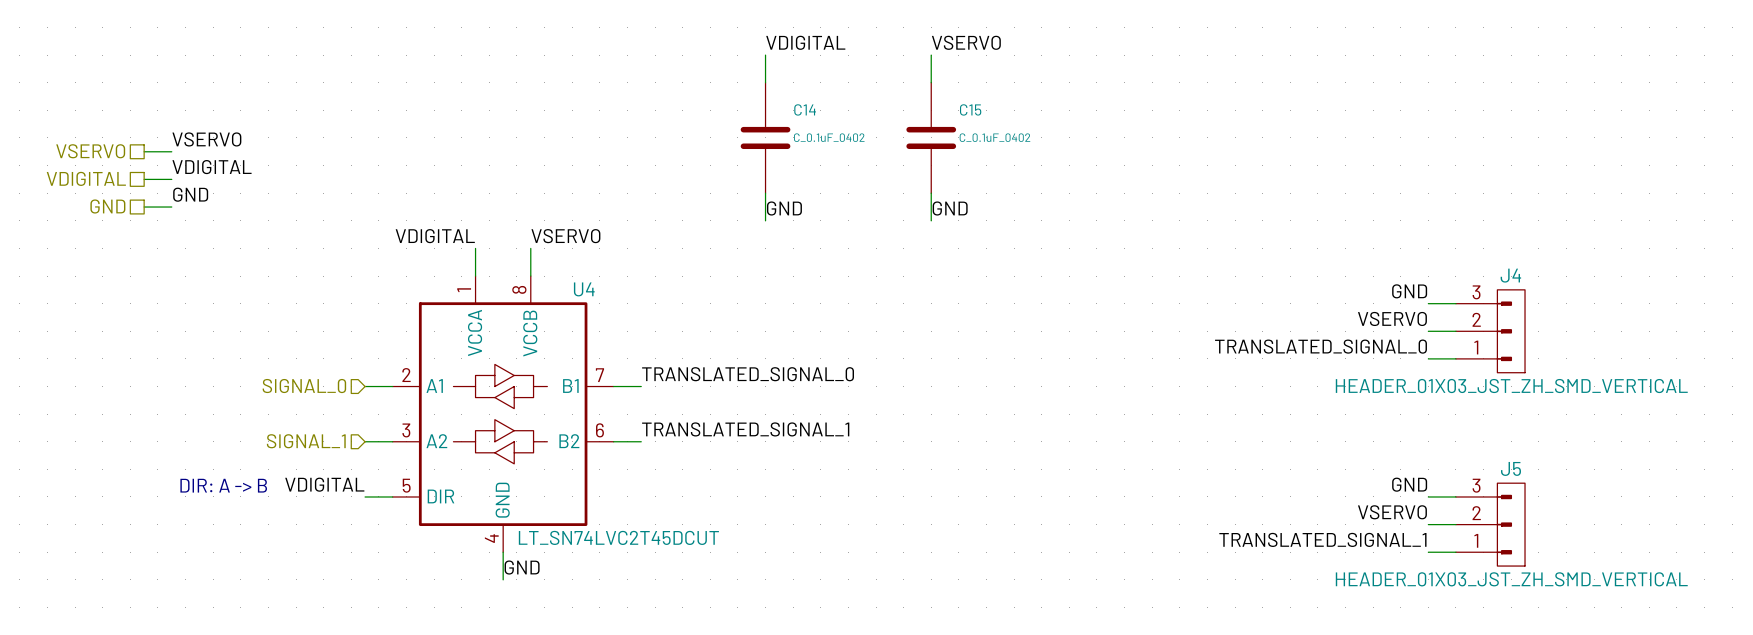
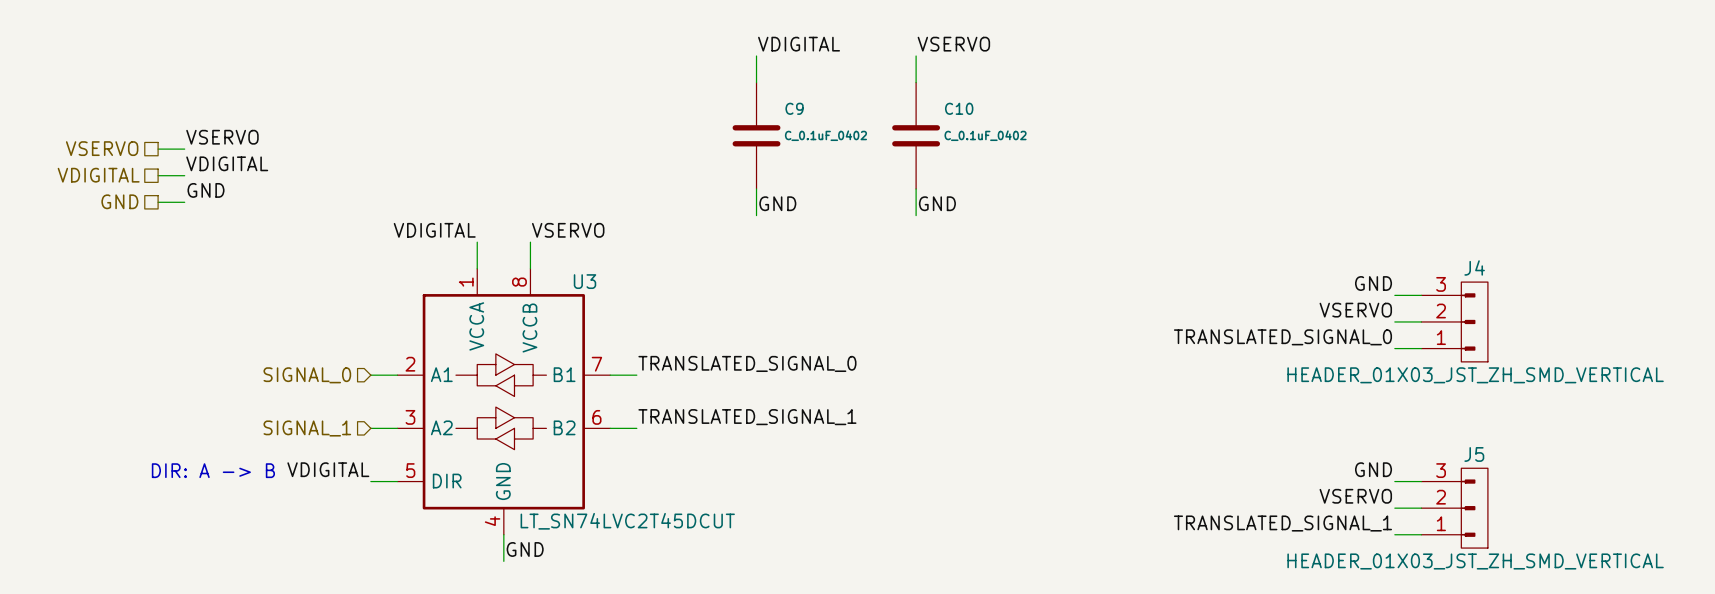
C14 name: C14 (805, 109) -> C9 (794, 108)
C15 name: C15 (970, 109) -> C10 (959, 108)
U4 name: U4 (584, 289) -> U3 (585, 281)

